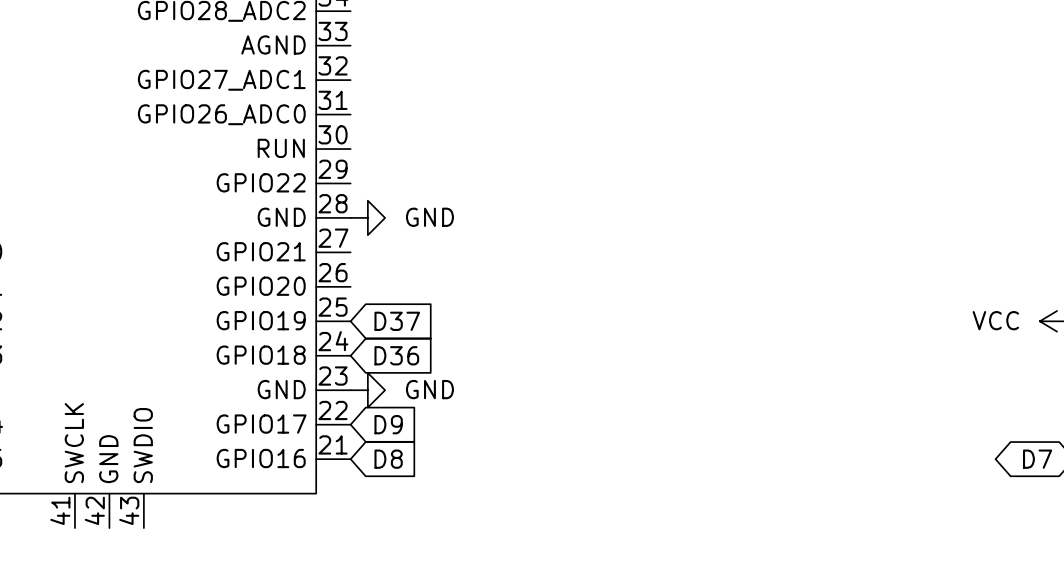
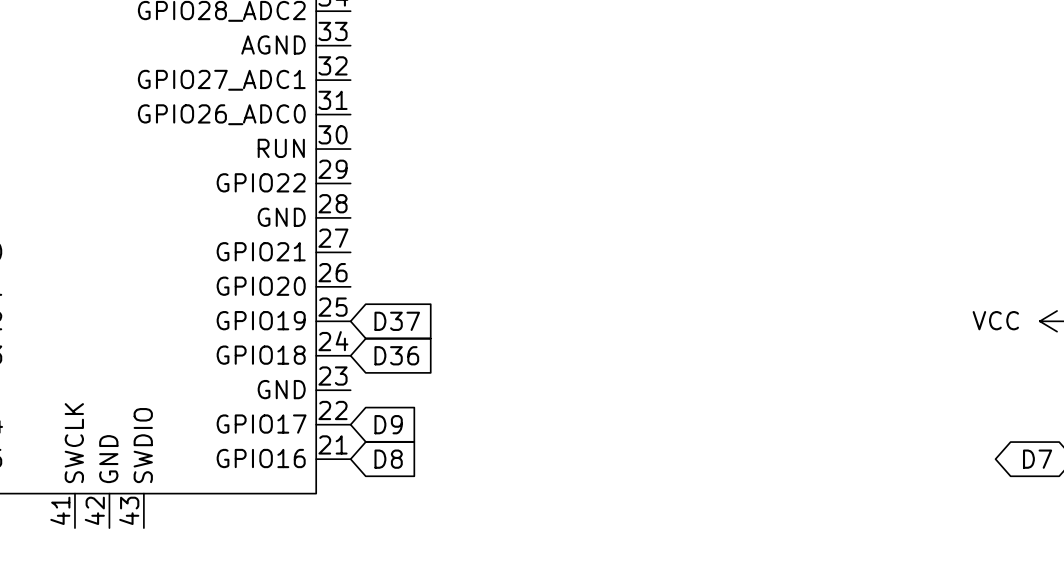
power symbol: GND (367, 217) -> none
power symbol: GND (367, 390) -> none

